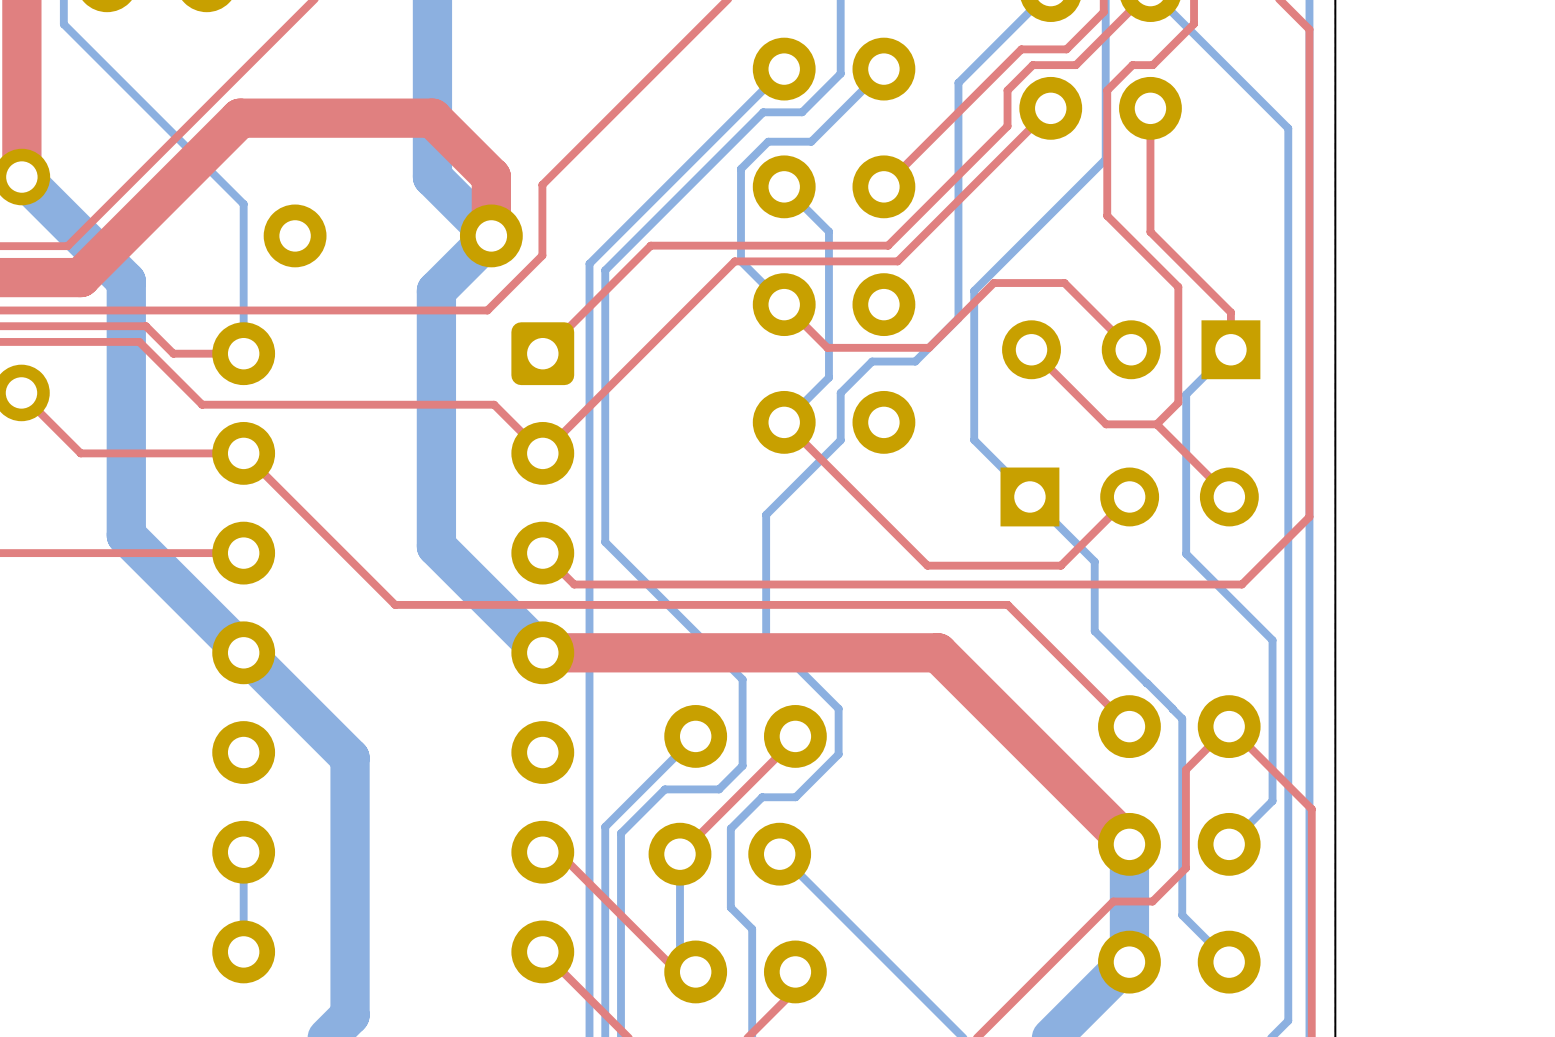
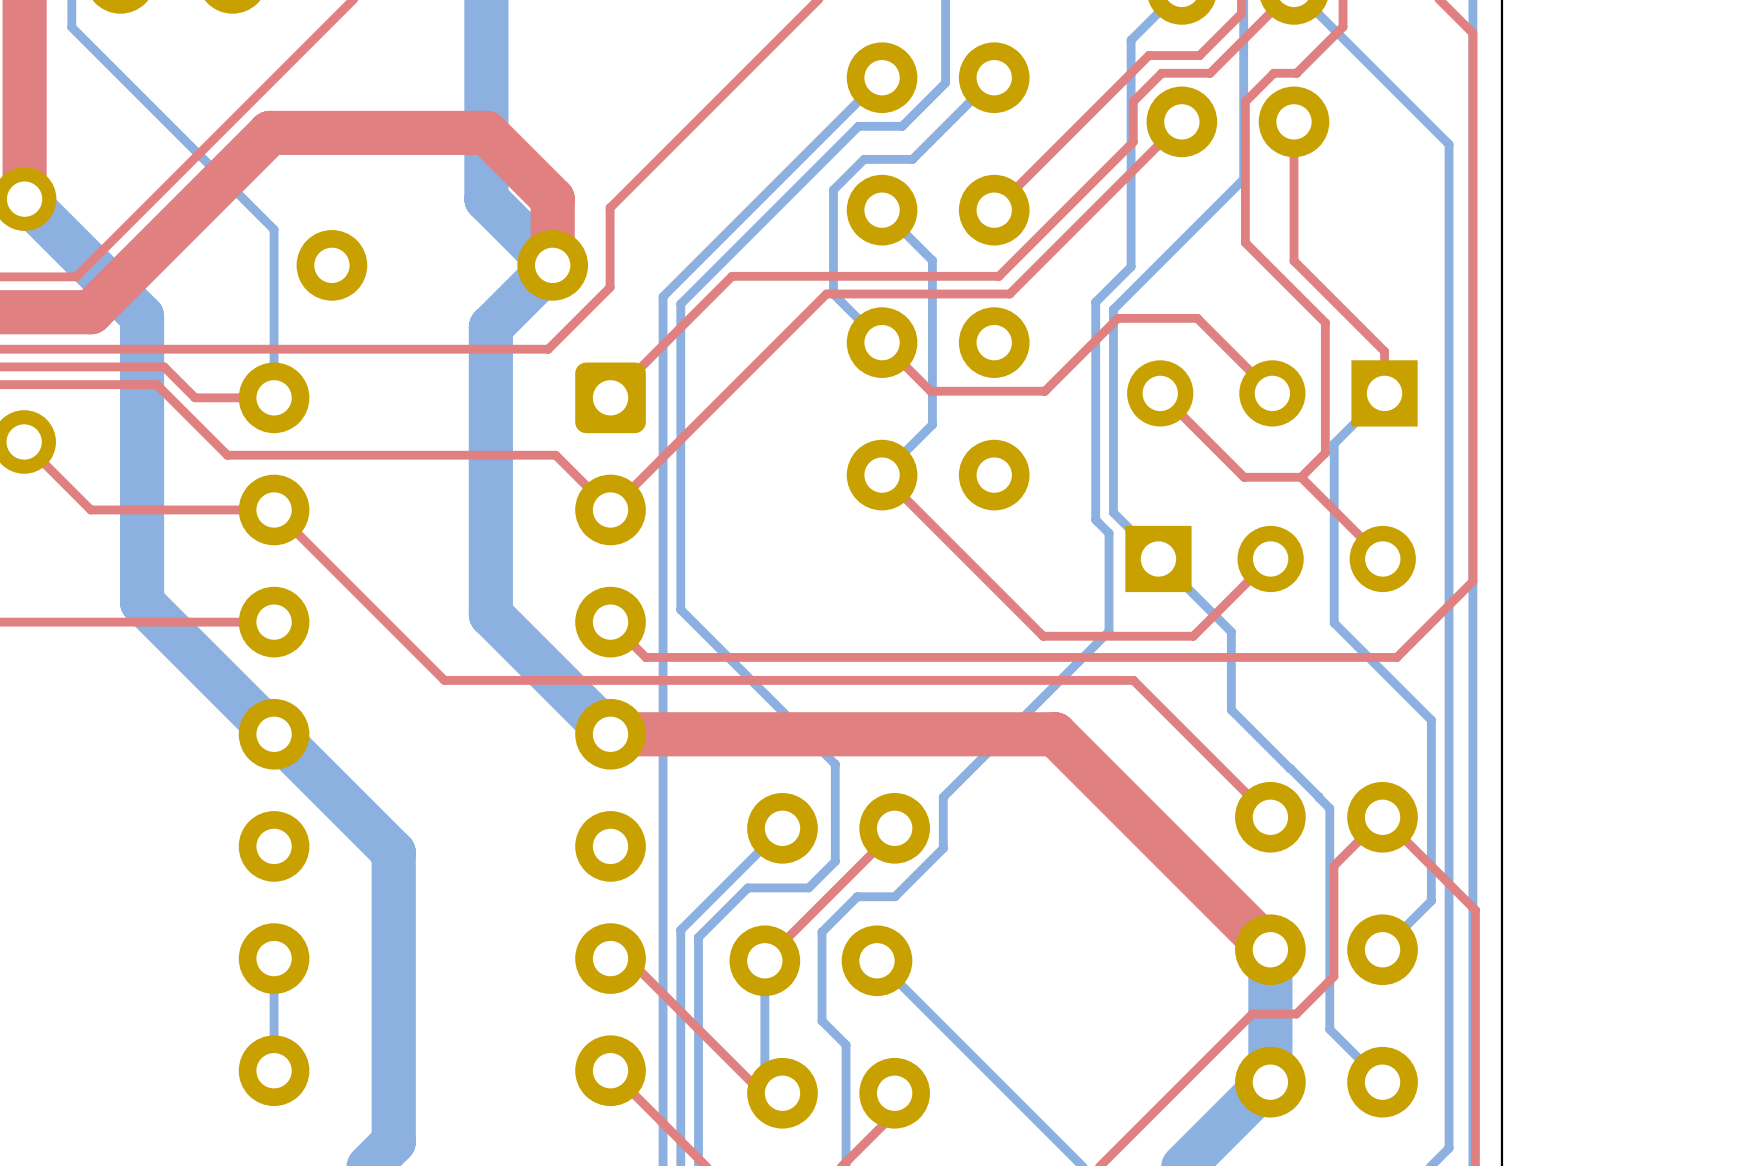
bottom track: (1005, 35) (958, 82) (958, 318) (915, 361) (872, 361) (840, 392) (840, 440) (766, 514) (766, 636) (838, 708) -> (1131, 40) (1131, 266) (1095, 302) (1095, 327)
bottom track: (989, 275) (974, 290) -> (1113, 309) (1113, 512)
bottom track: (974, 440) (989, 455) -> (1095, 494) (1095, 519) (1109, 533) (1109, 631) (943, 797)

